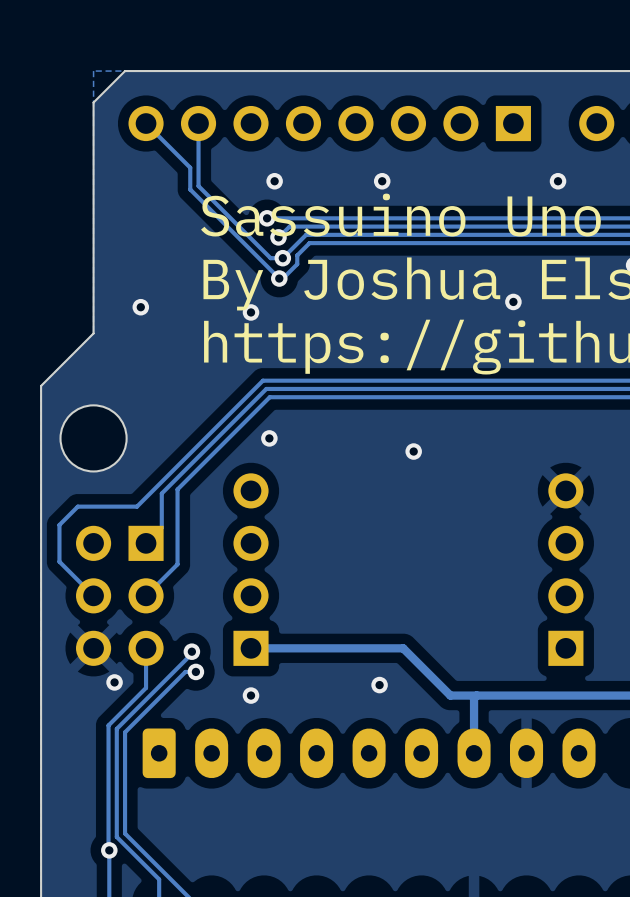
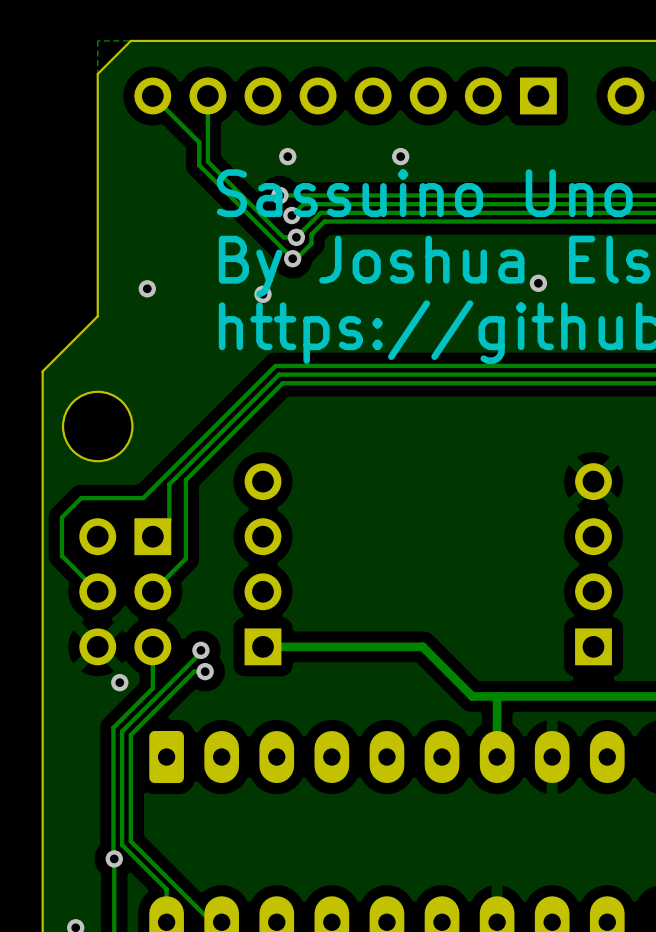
via: (558, 181) -> none
via: (269, 438) -> none
via: (413, 451) -> none
via: (379, 685) -> none
via: (251, 695) -> none

